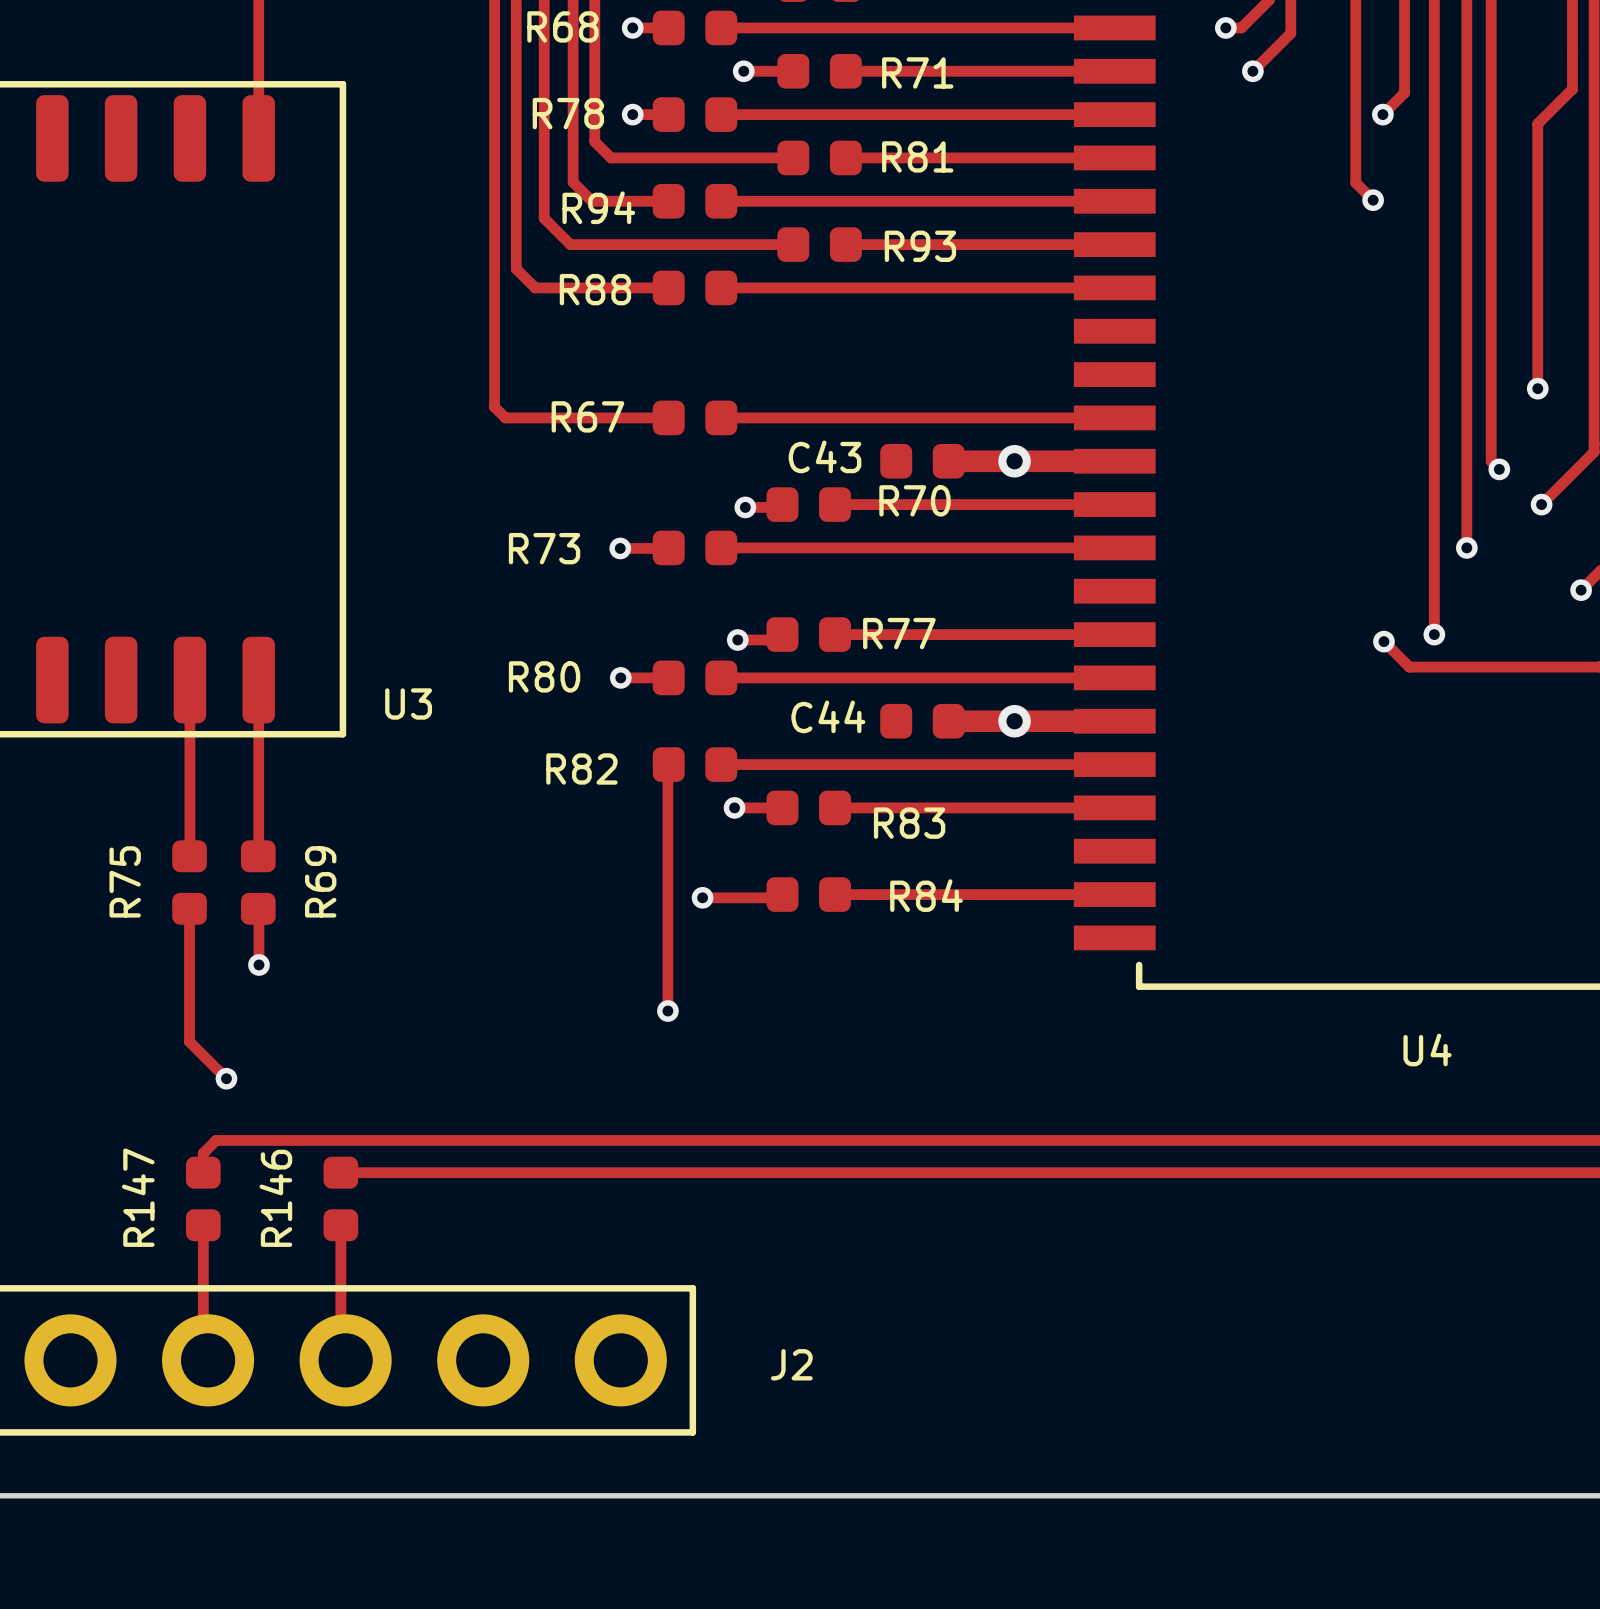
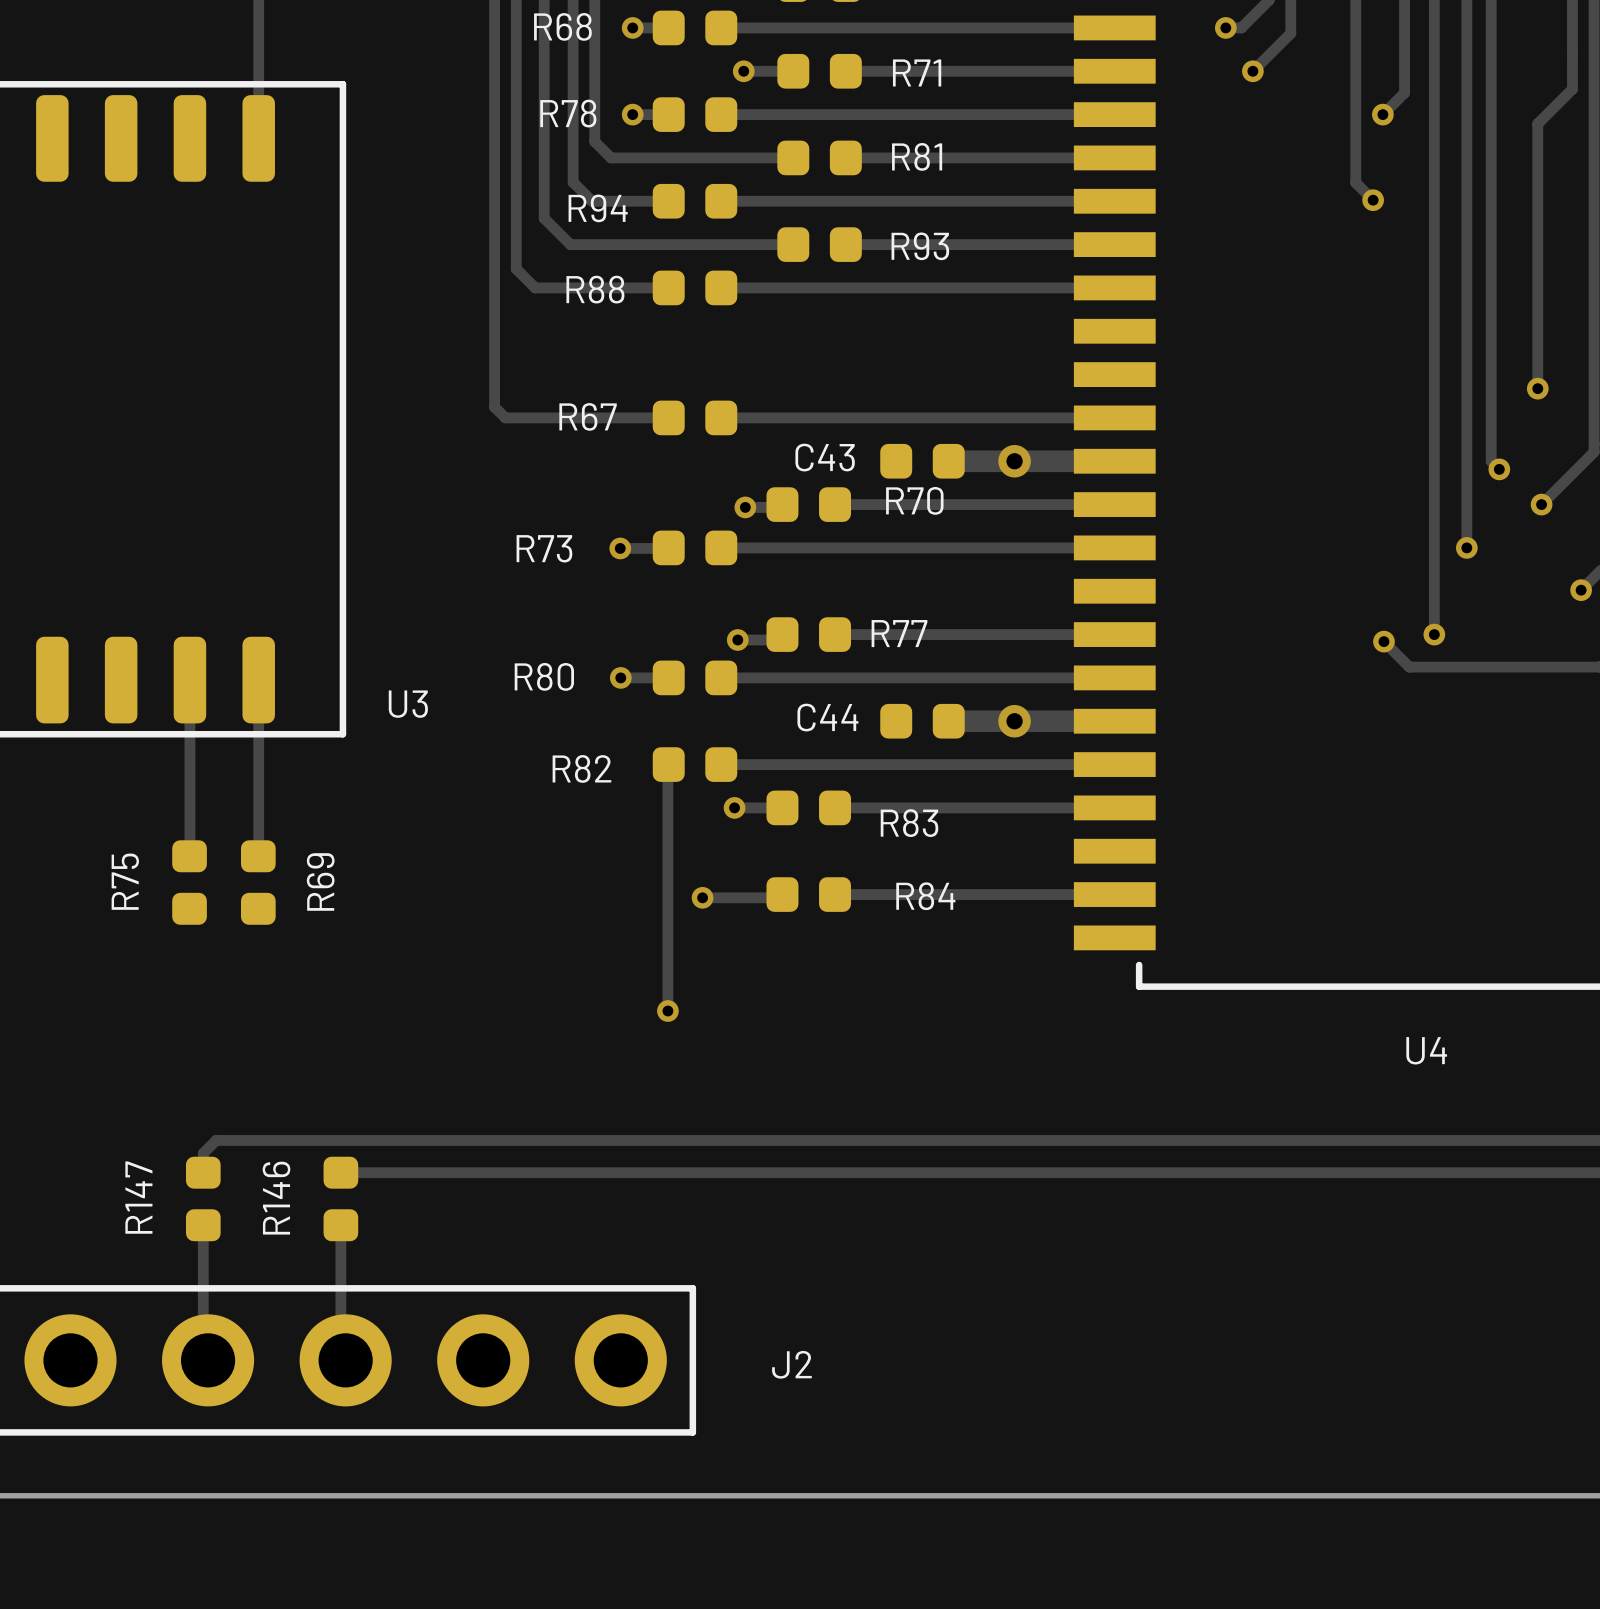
track: (189, 908) (189, 1041) (226, 1078) -> none
track: (258, 909) (258, 964) -> none
via: (258, 964) -> none
via: (226, 1078) -> none

